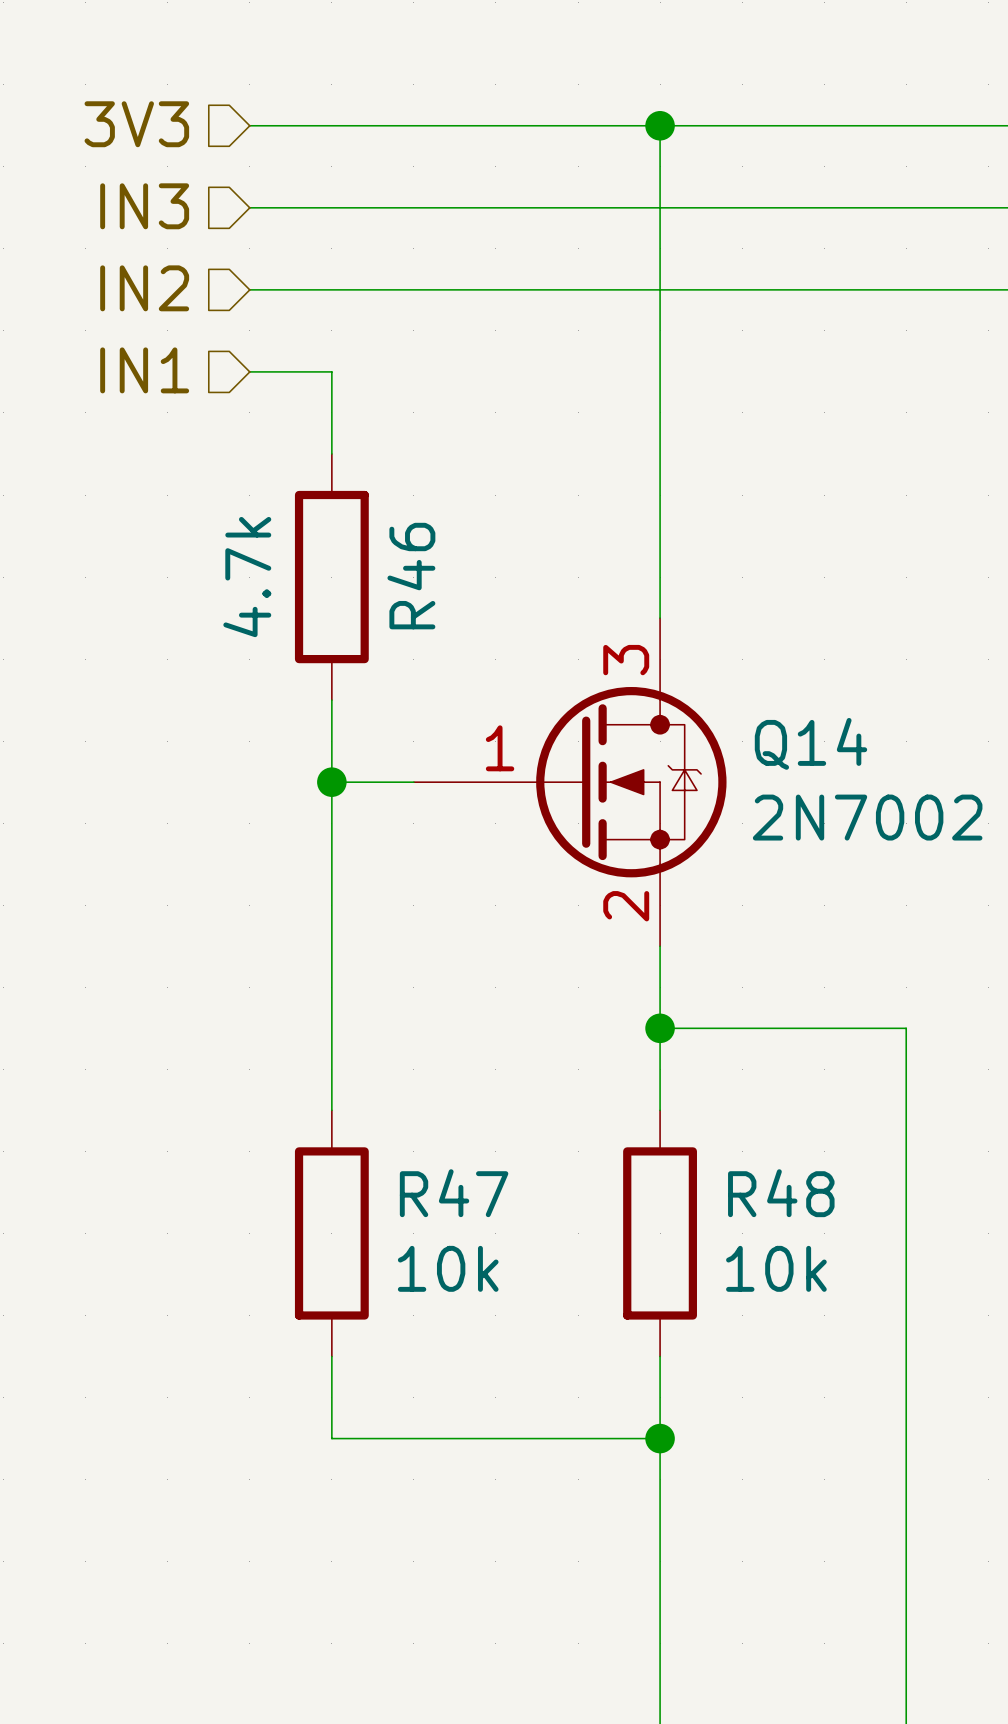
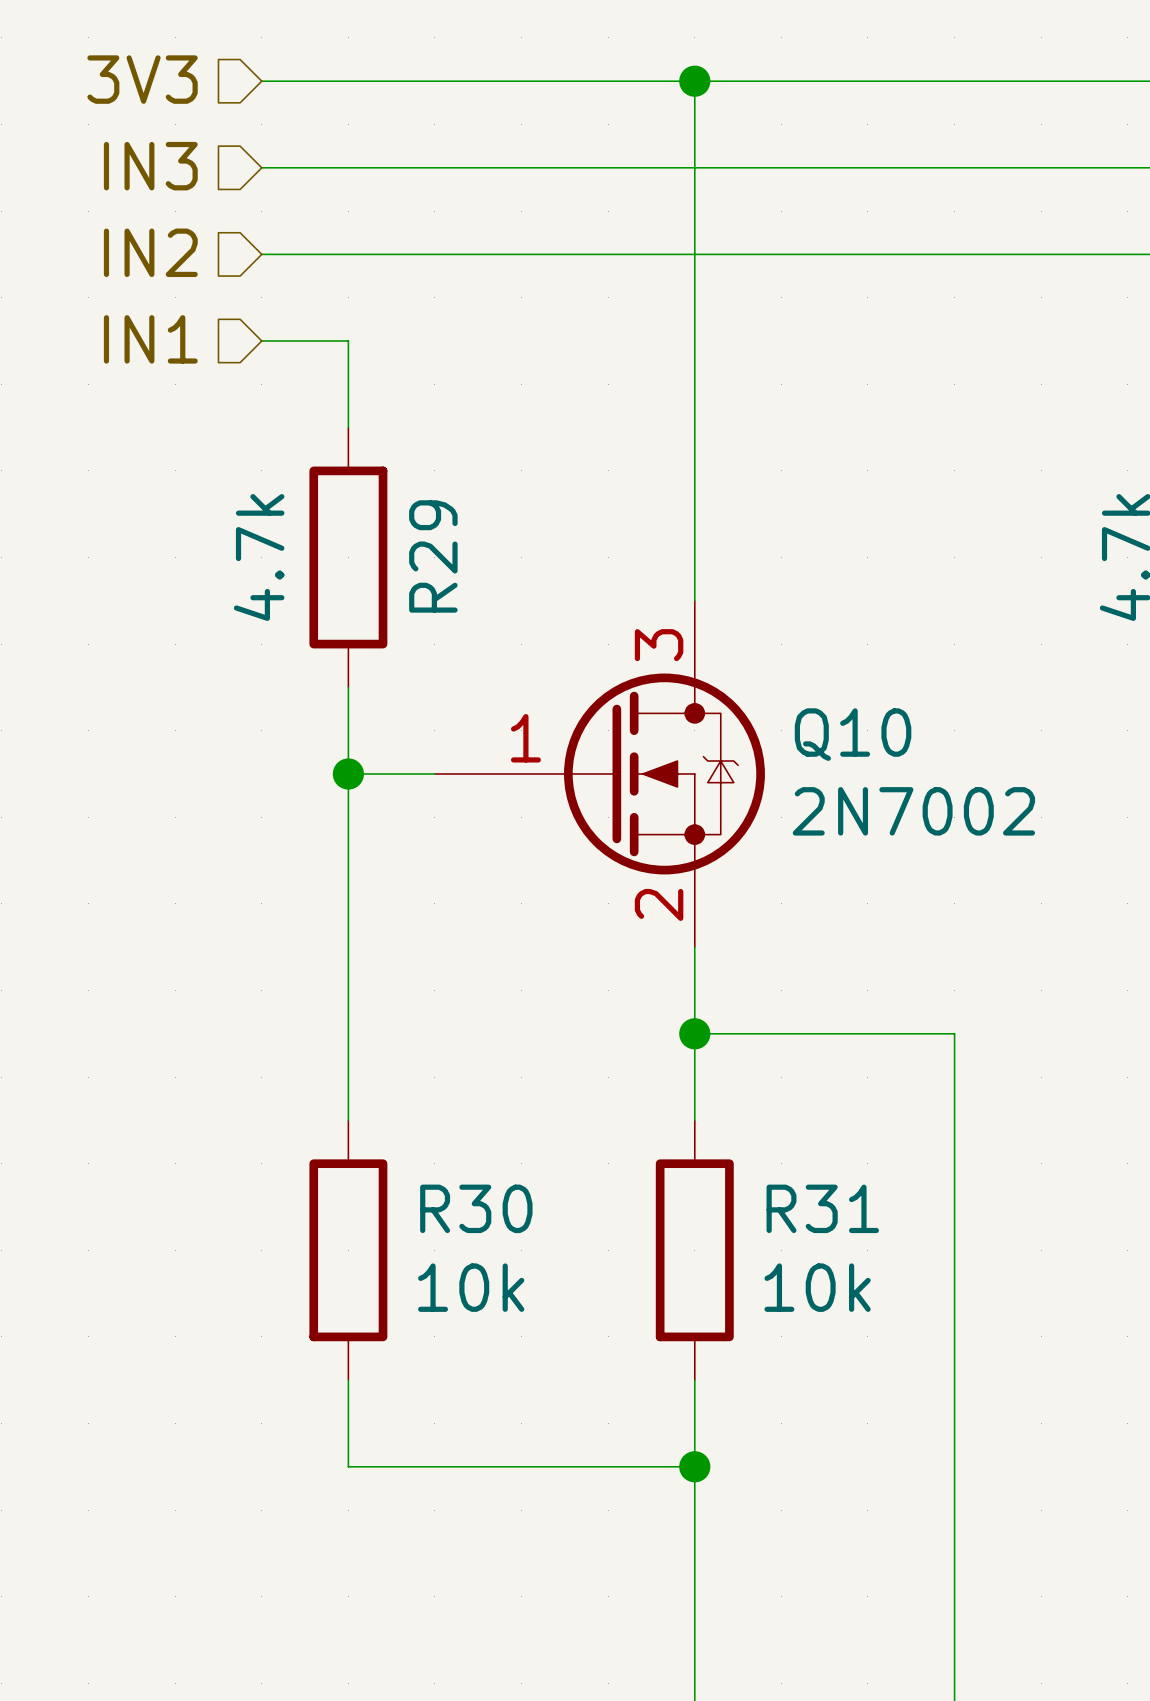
R46 name: R46 (411, 576) -> R29 (433, 556)
Q14 name: Q14 (810, 743) -> Q10 (853, 734)
R47 name: R47 (454, 1193) -> R30 (476, 1208)
R48 name: R48 (781, 1193) -> R31 (822, 1208)

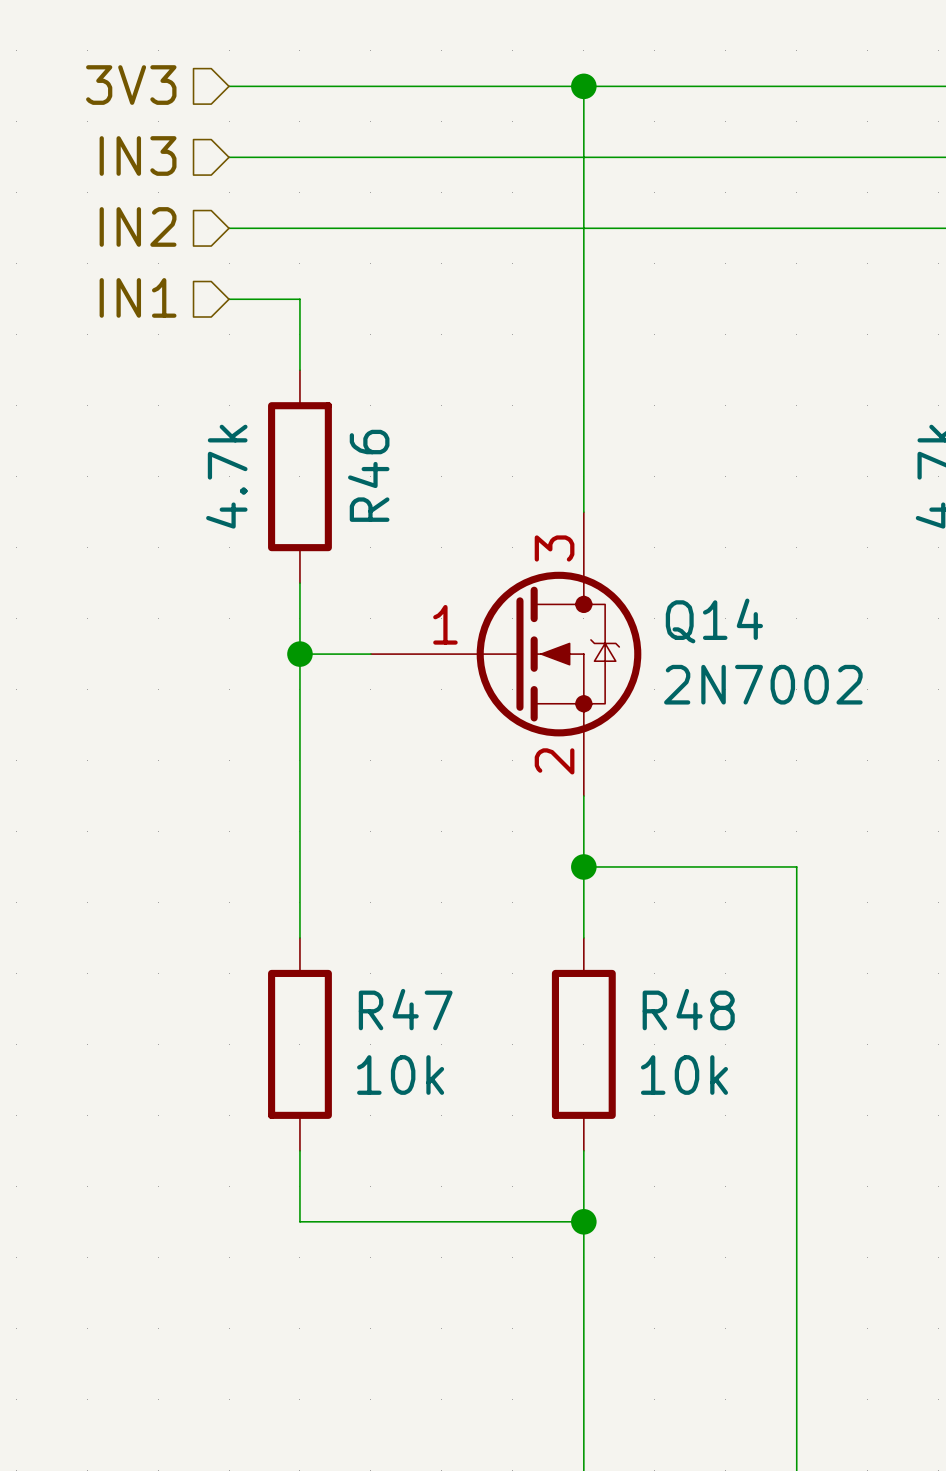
R29 name: R29 (433, 556) -> R46 (368, 475)
Q10 name: Q10 (853, 734) -> Q14 (714, 620)
R30 name: R30 (476, 1208) -> R47 (405, 1009)
R31 name: R31 (822, 1208) -> R48 (688, 1009)

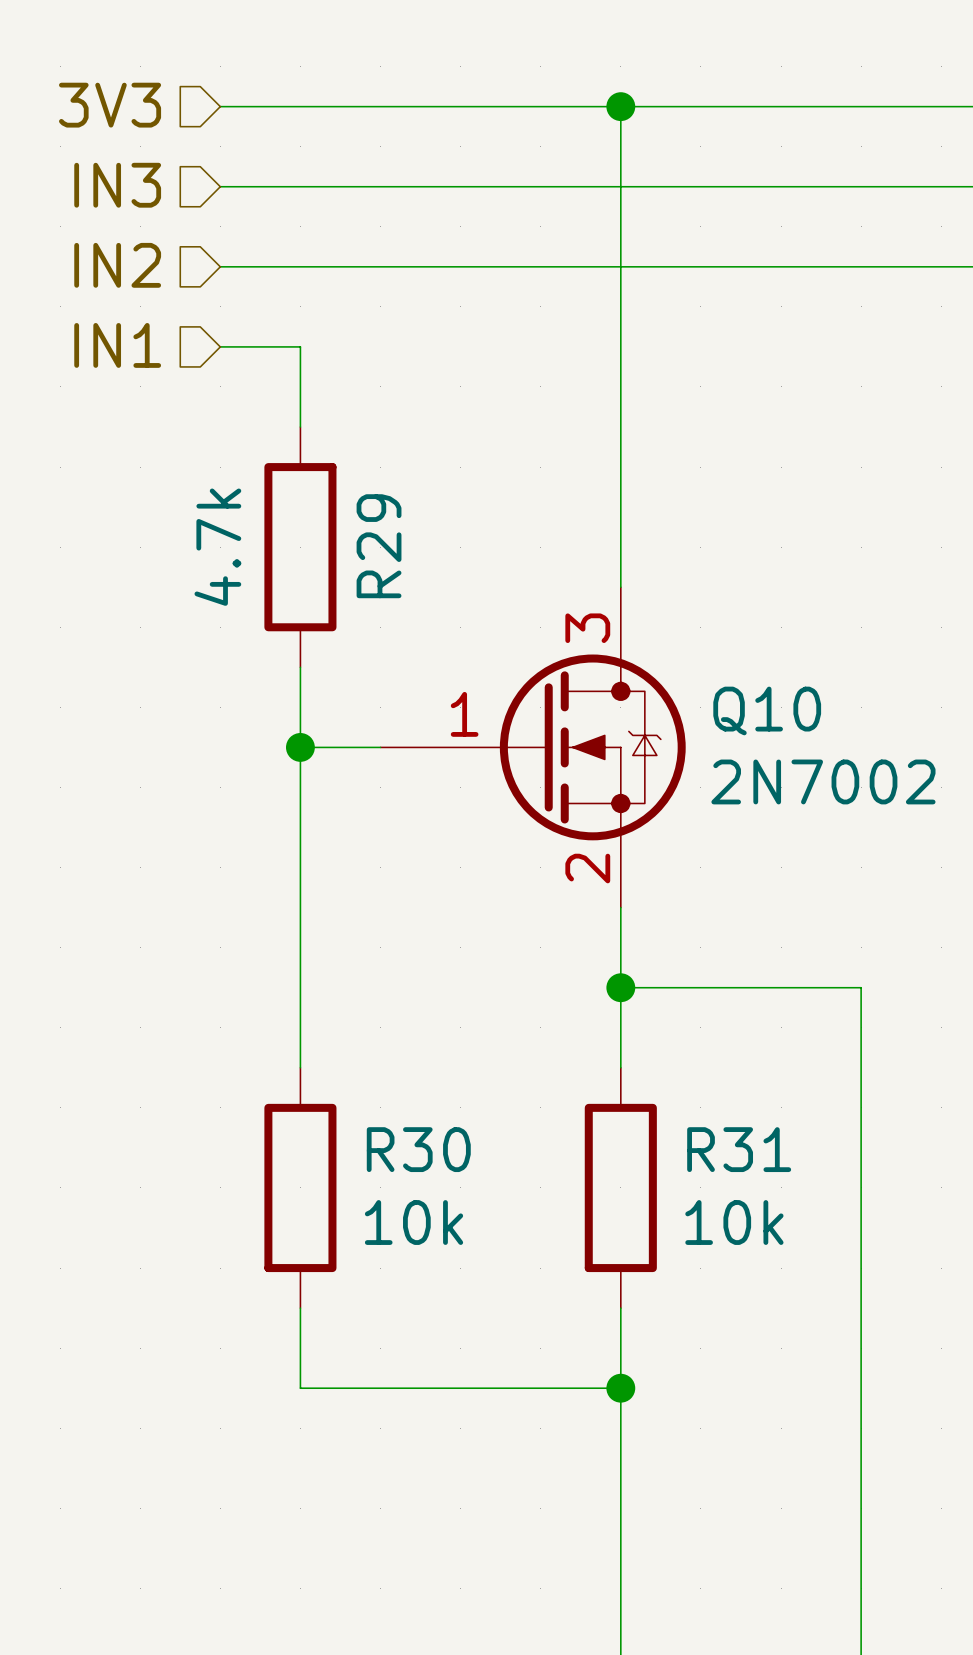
R46 name: R46 (368, 475) -> R29 (379, 546)
Q14 name: Q14 (714, 620) -> Q10 (767, 710)
R47 name: R47 (405, 1009) -> R30 (418, 1149)
R48 name: R48 (688, 1009) -> R31 (739, 1149)

